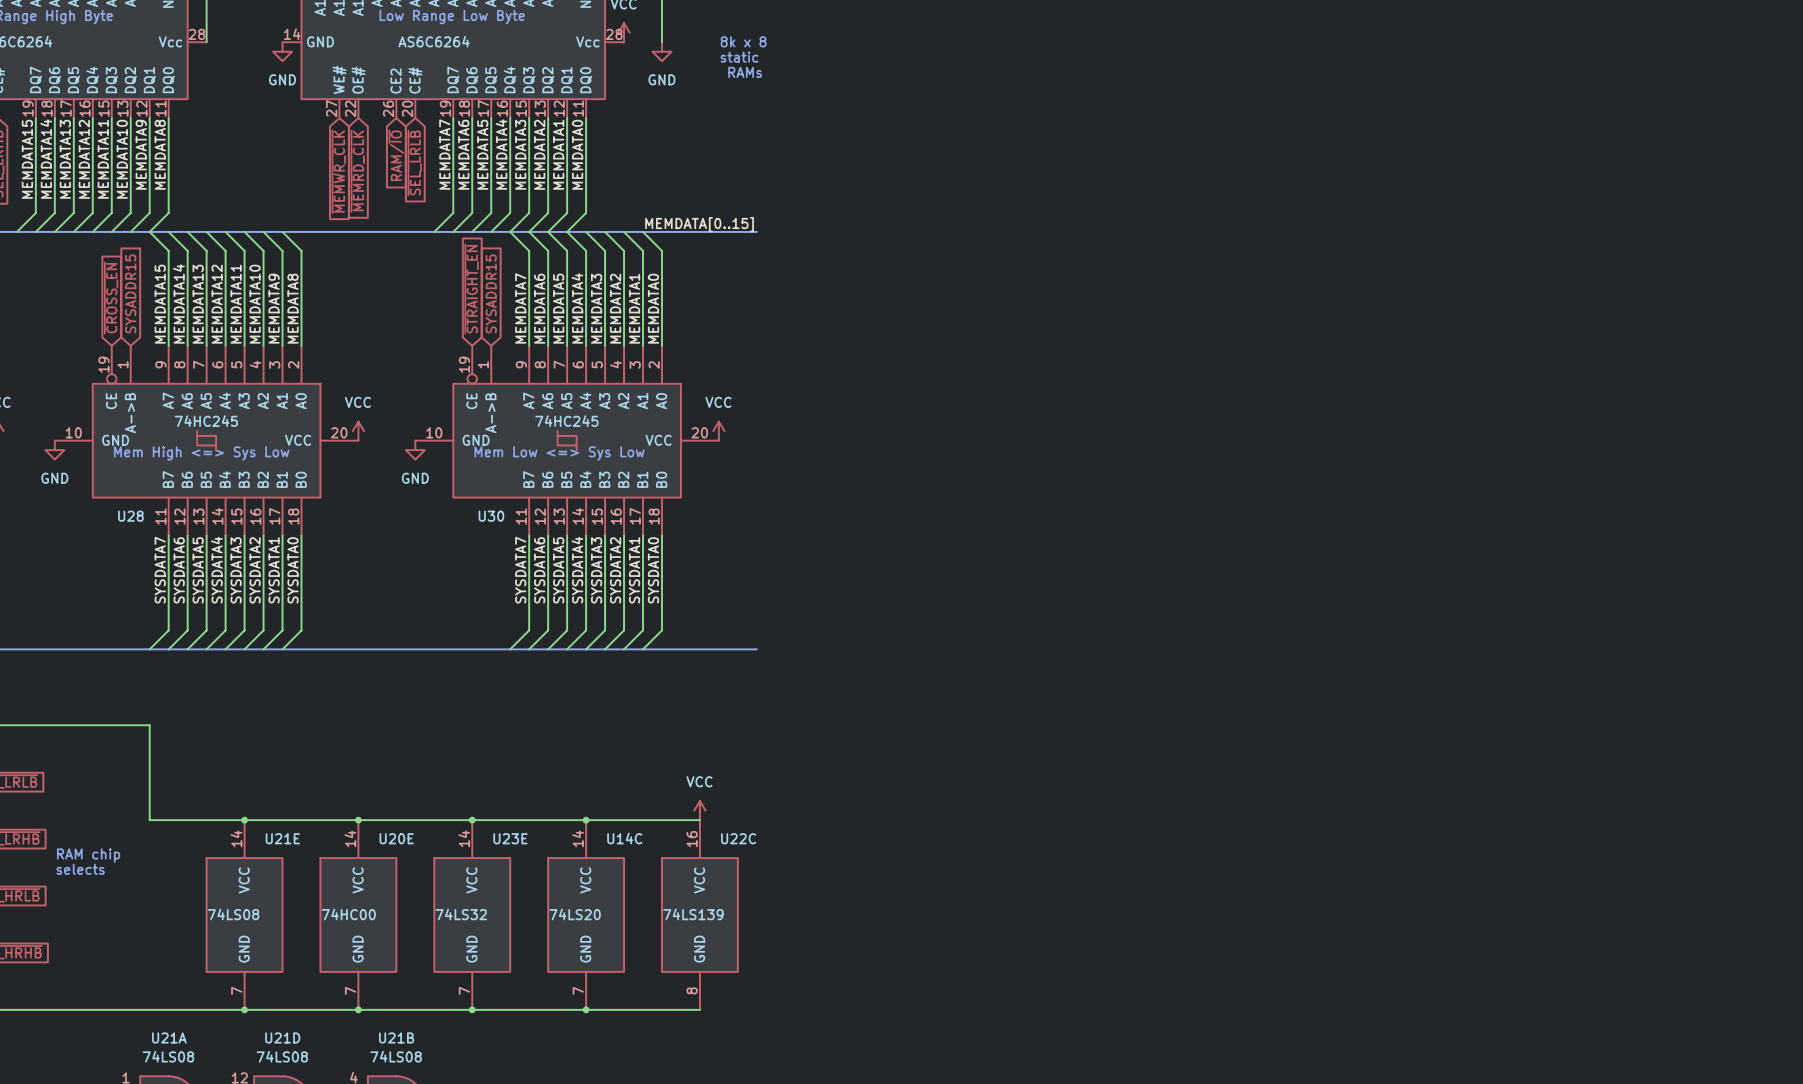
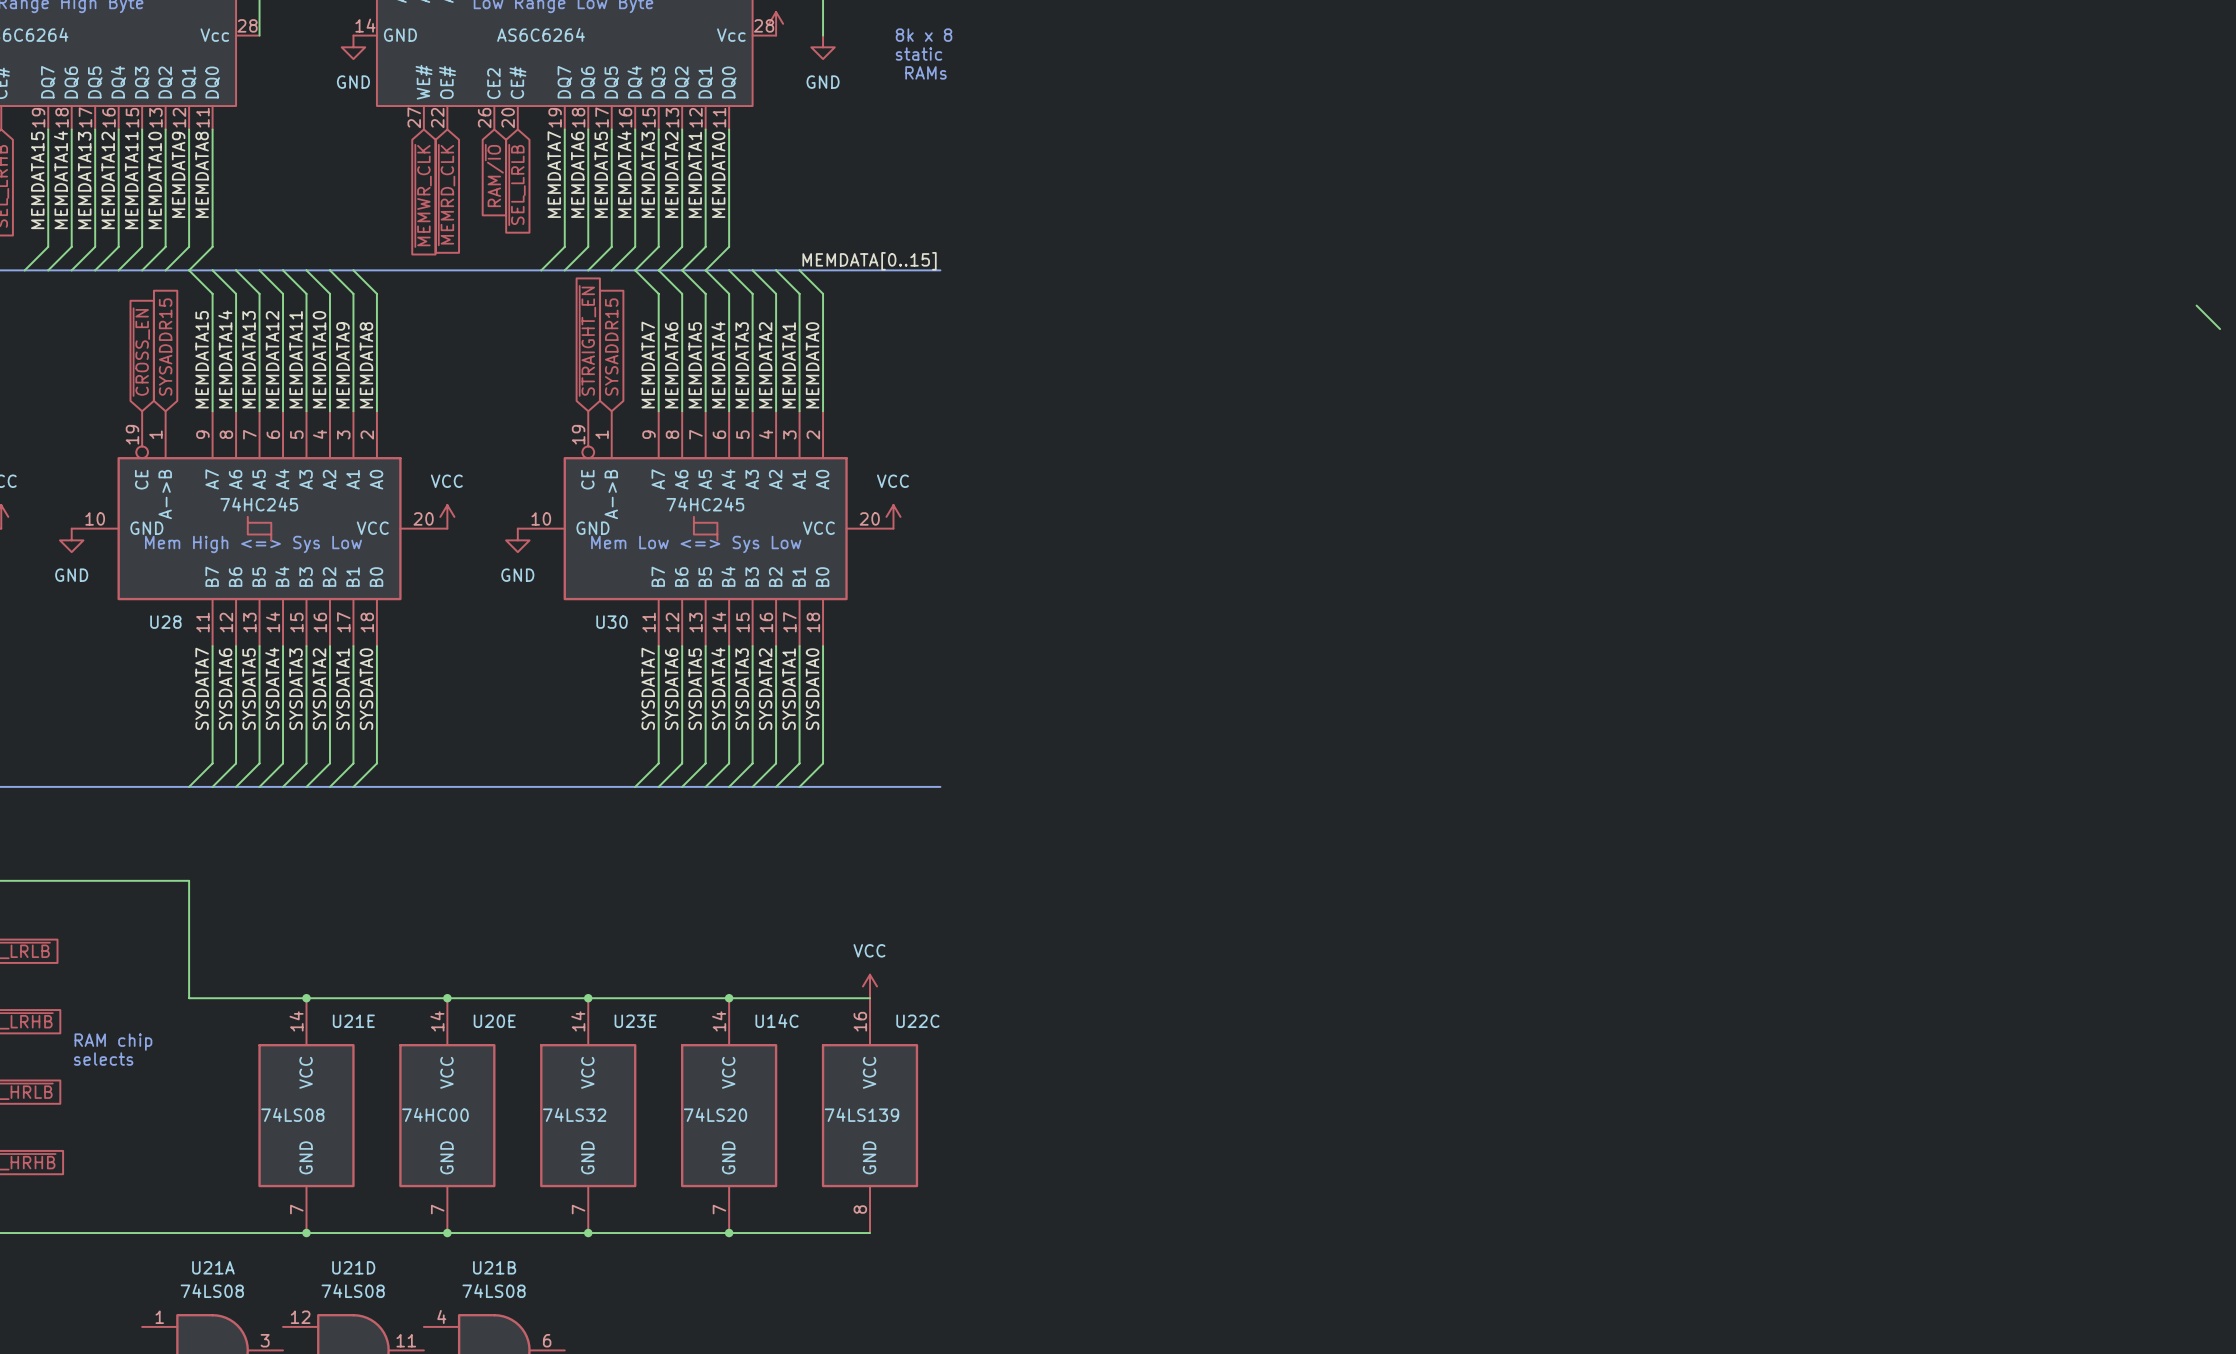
wire: none -> (2196, 305) (2220, 329)

